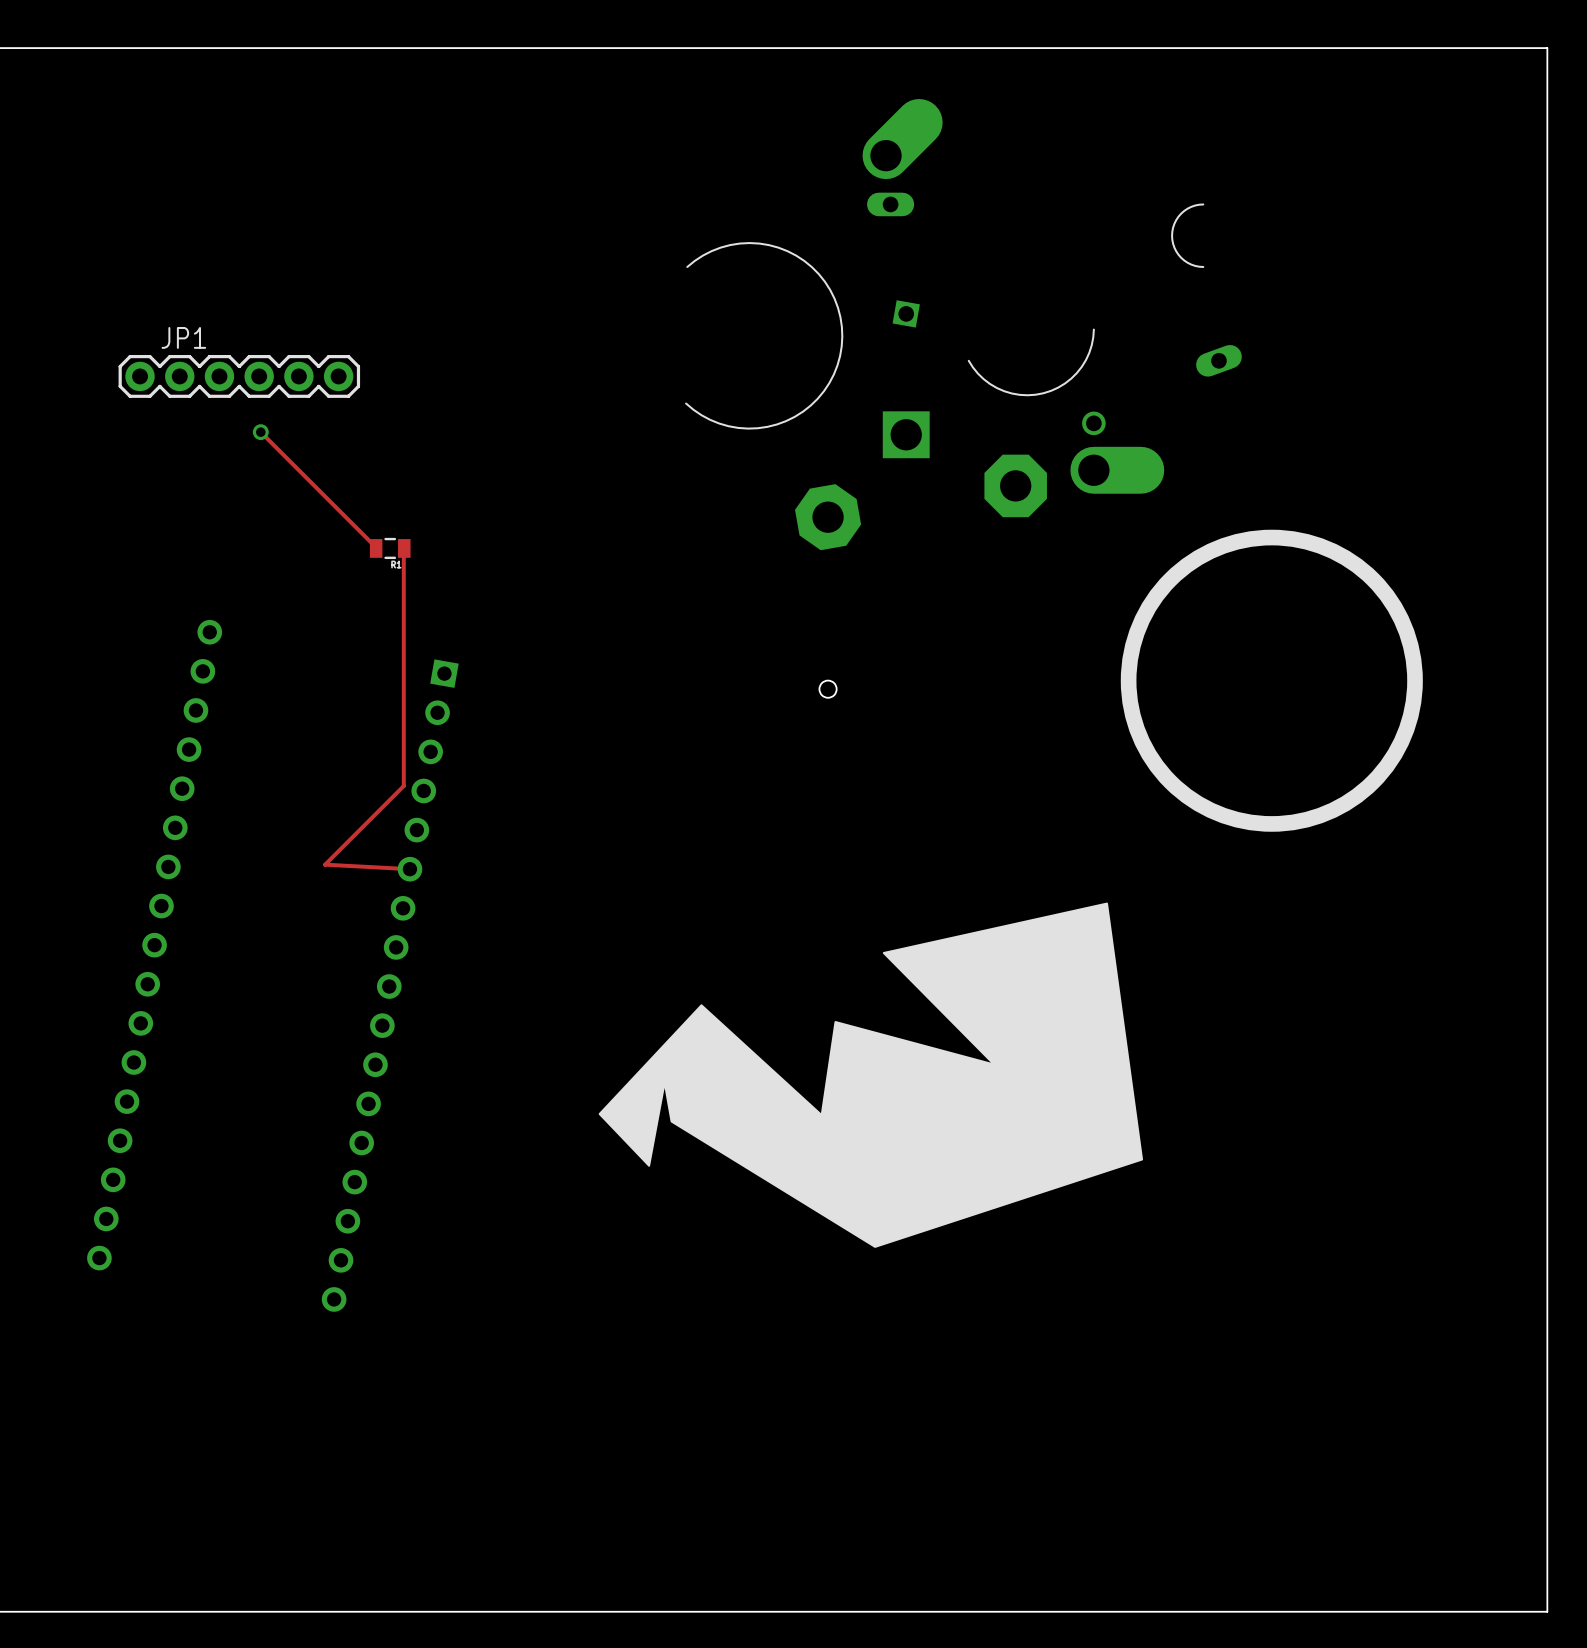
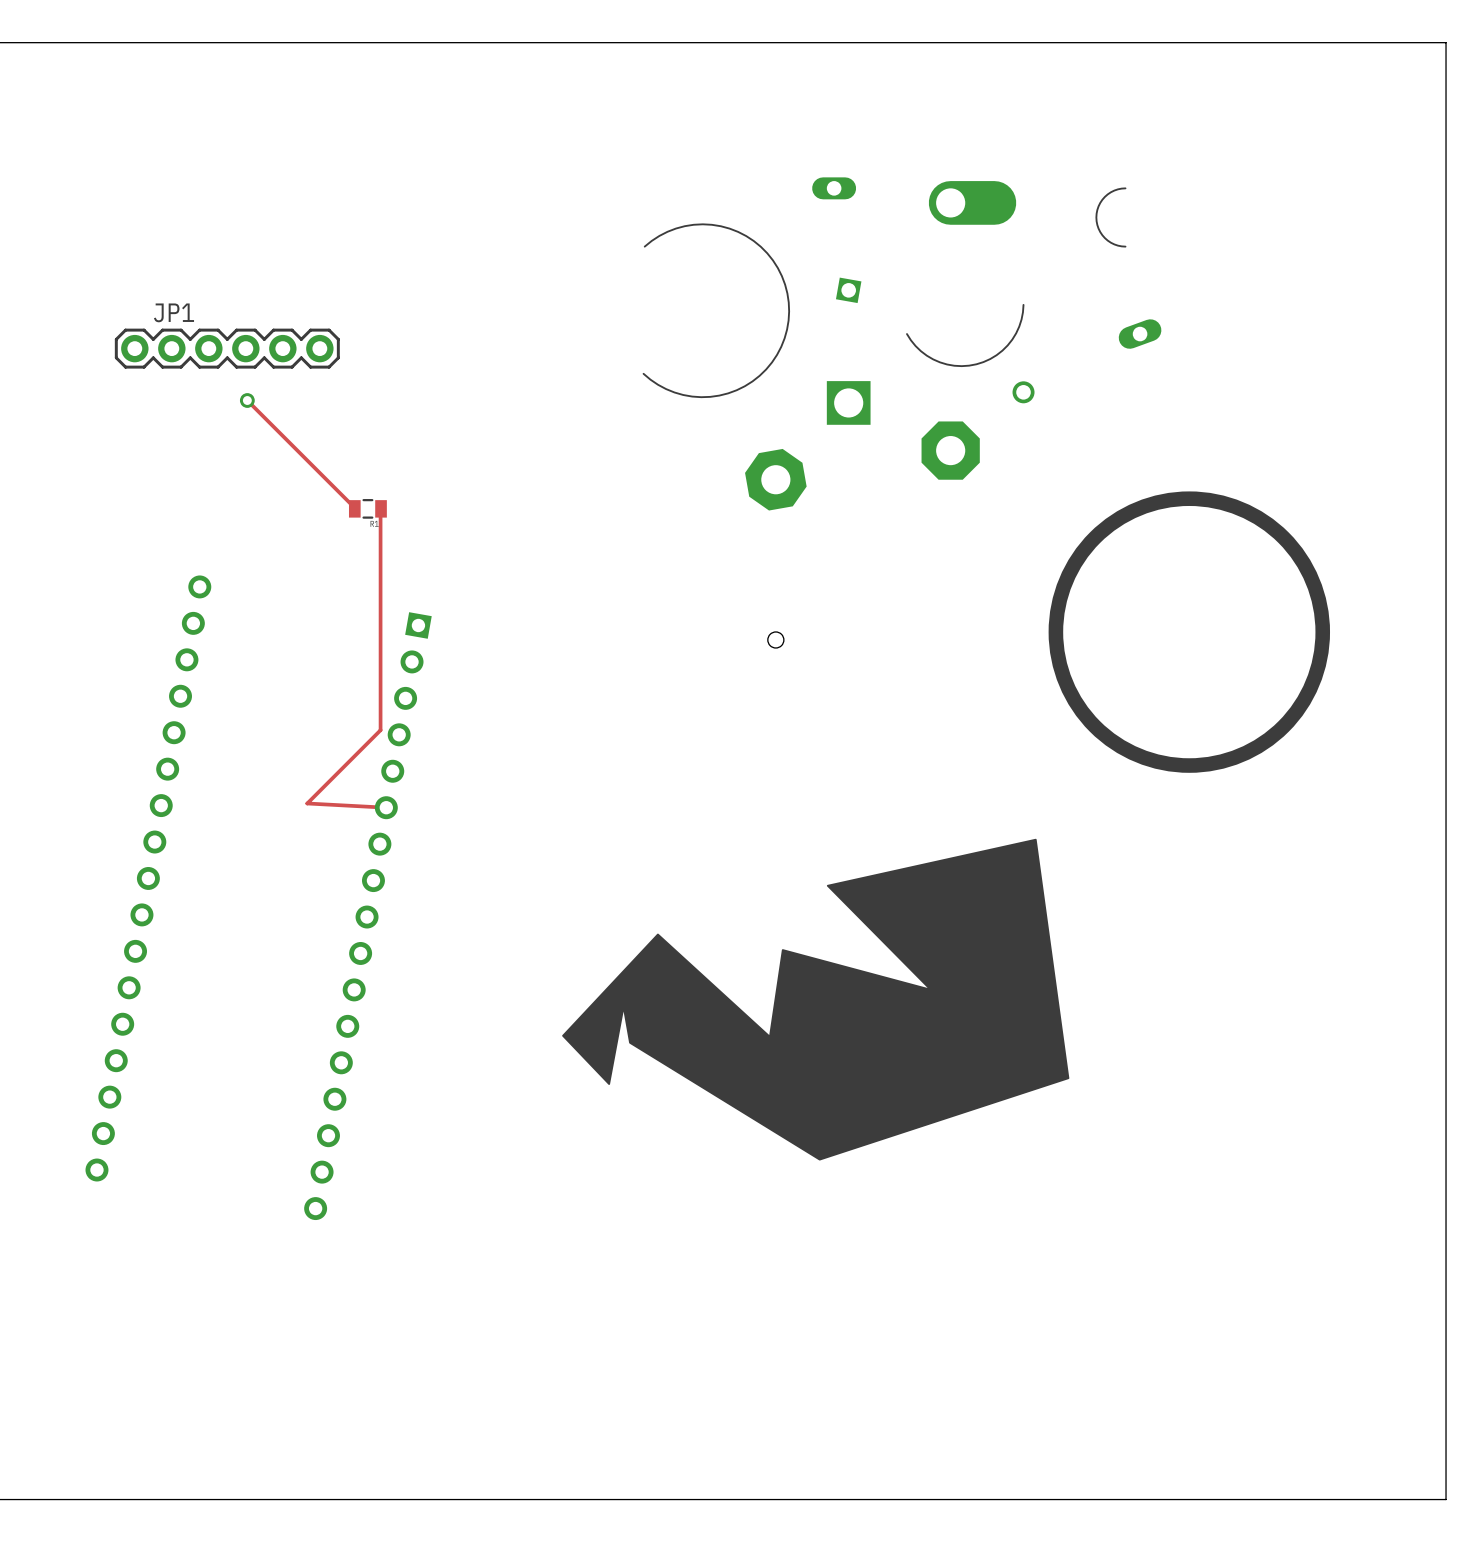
part: (902, 139) -> none
part position: (1117, 470) -> (972, 202)

